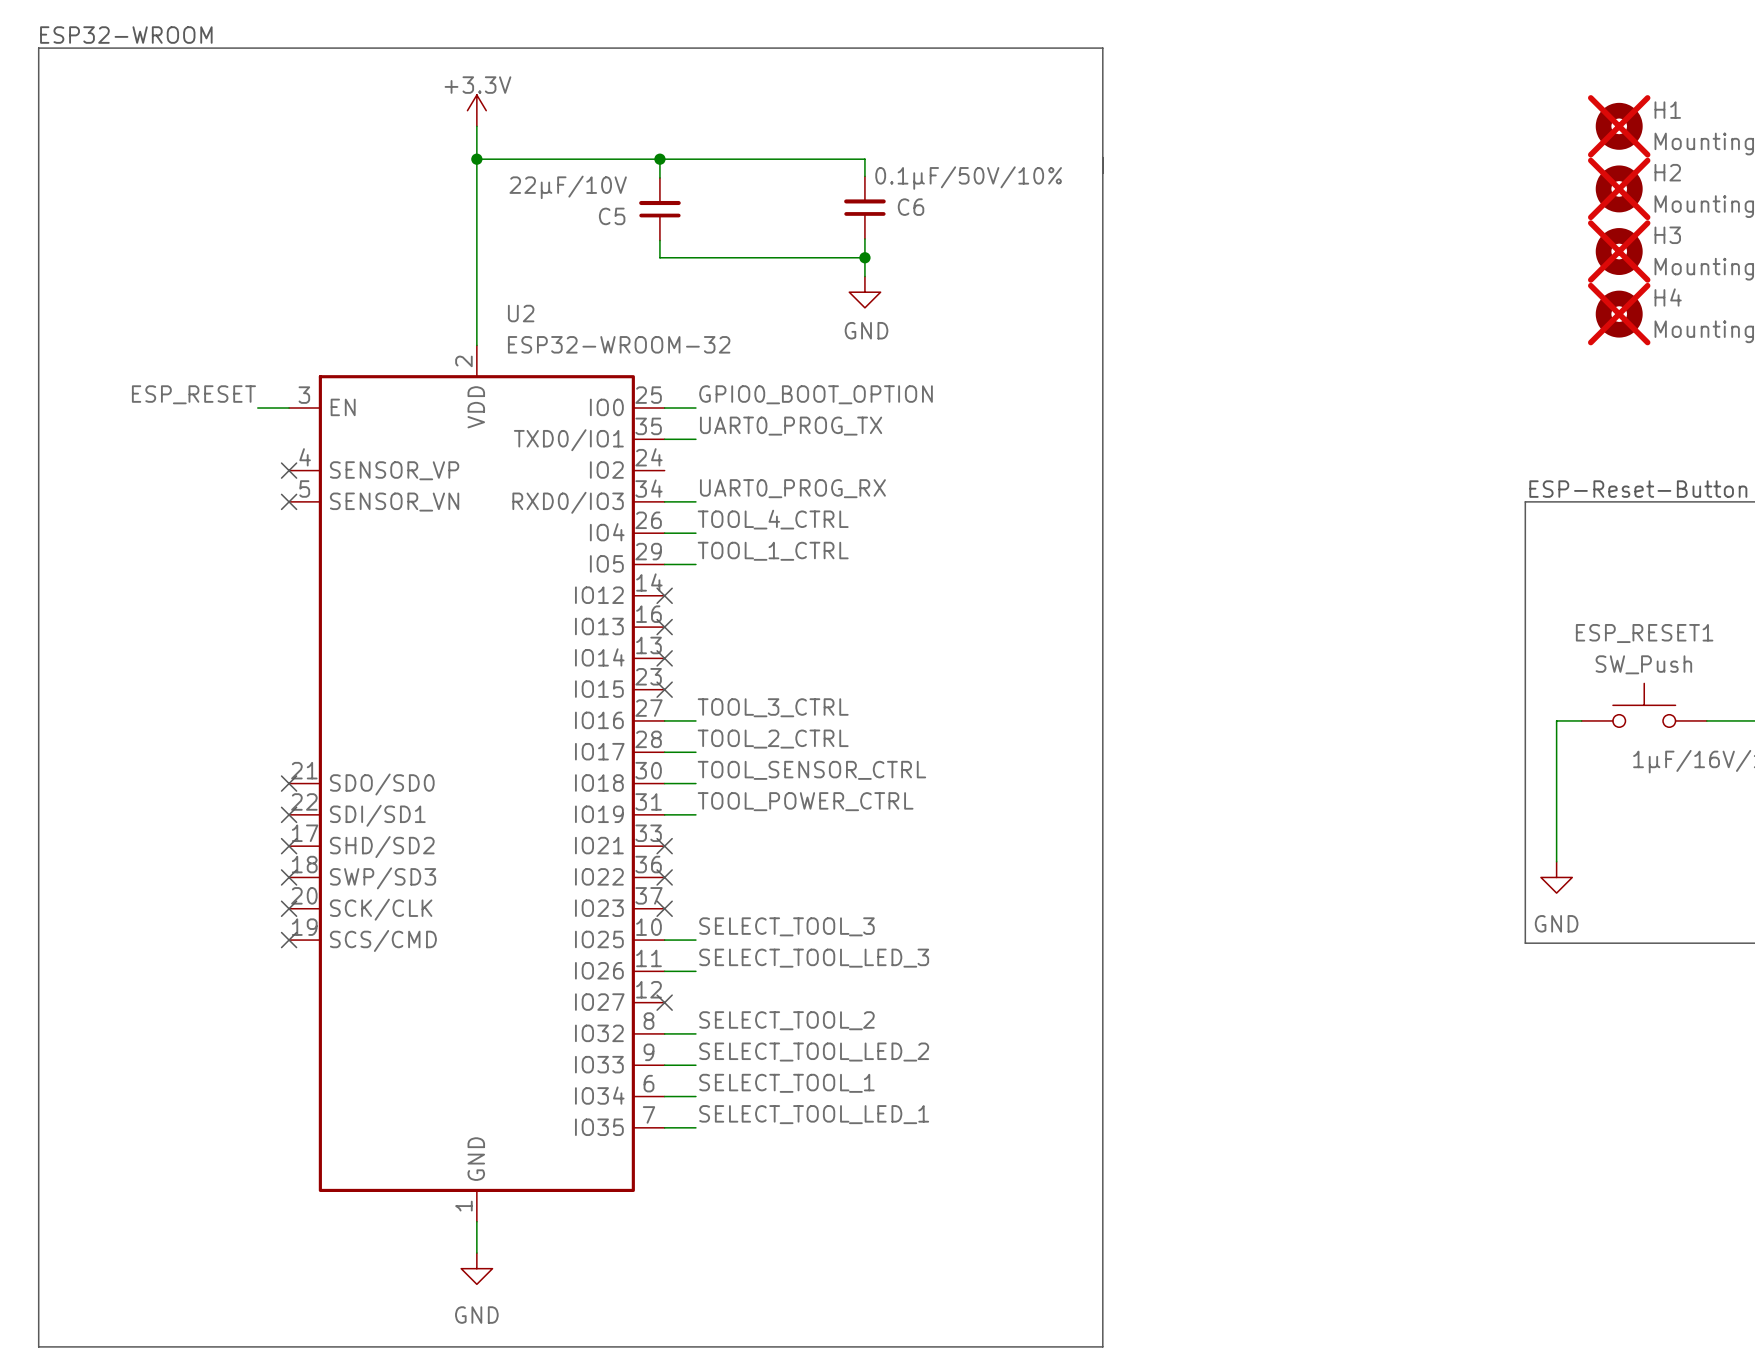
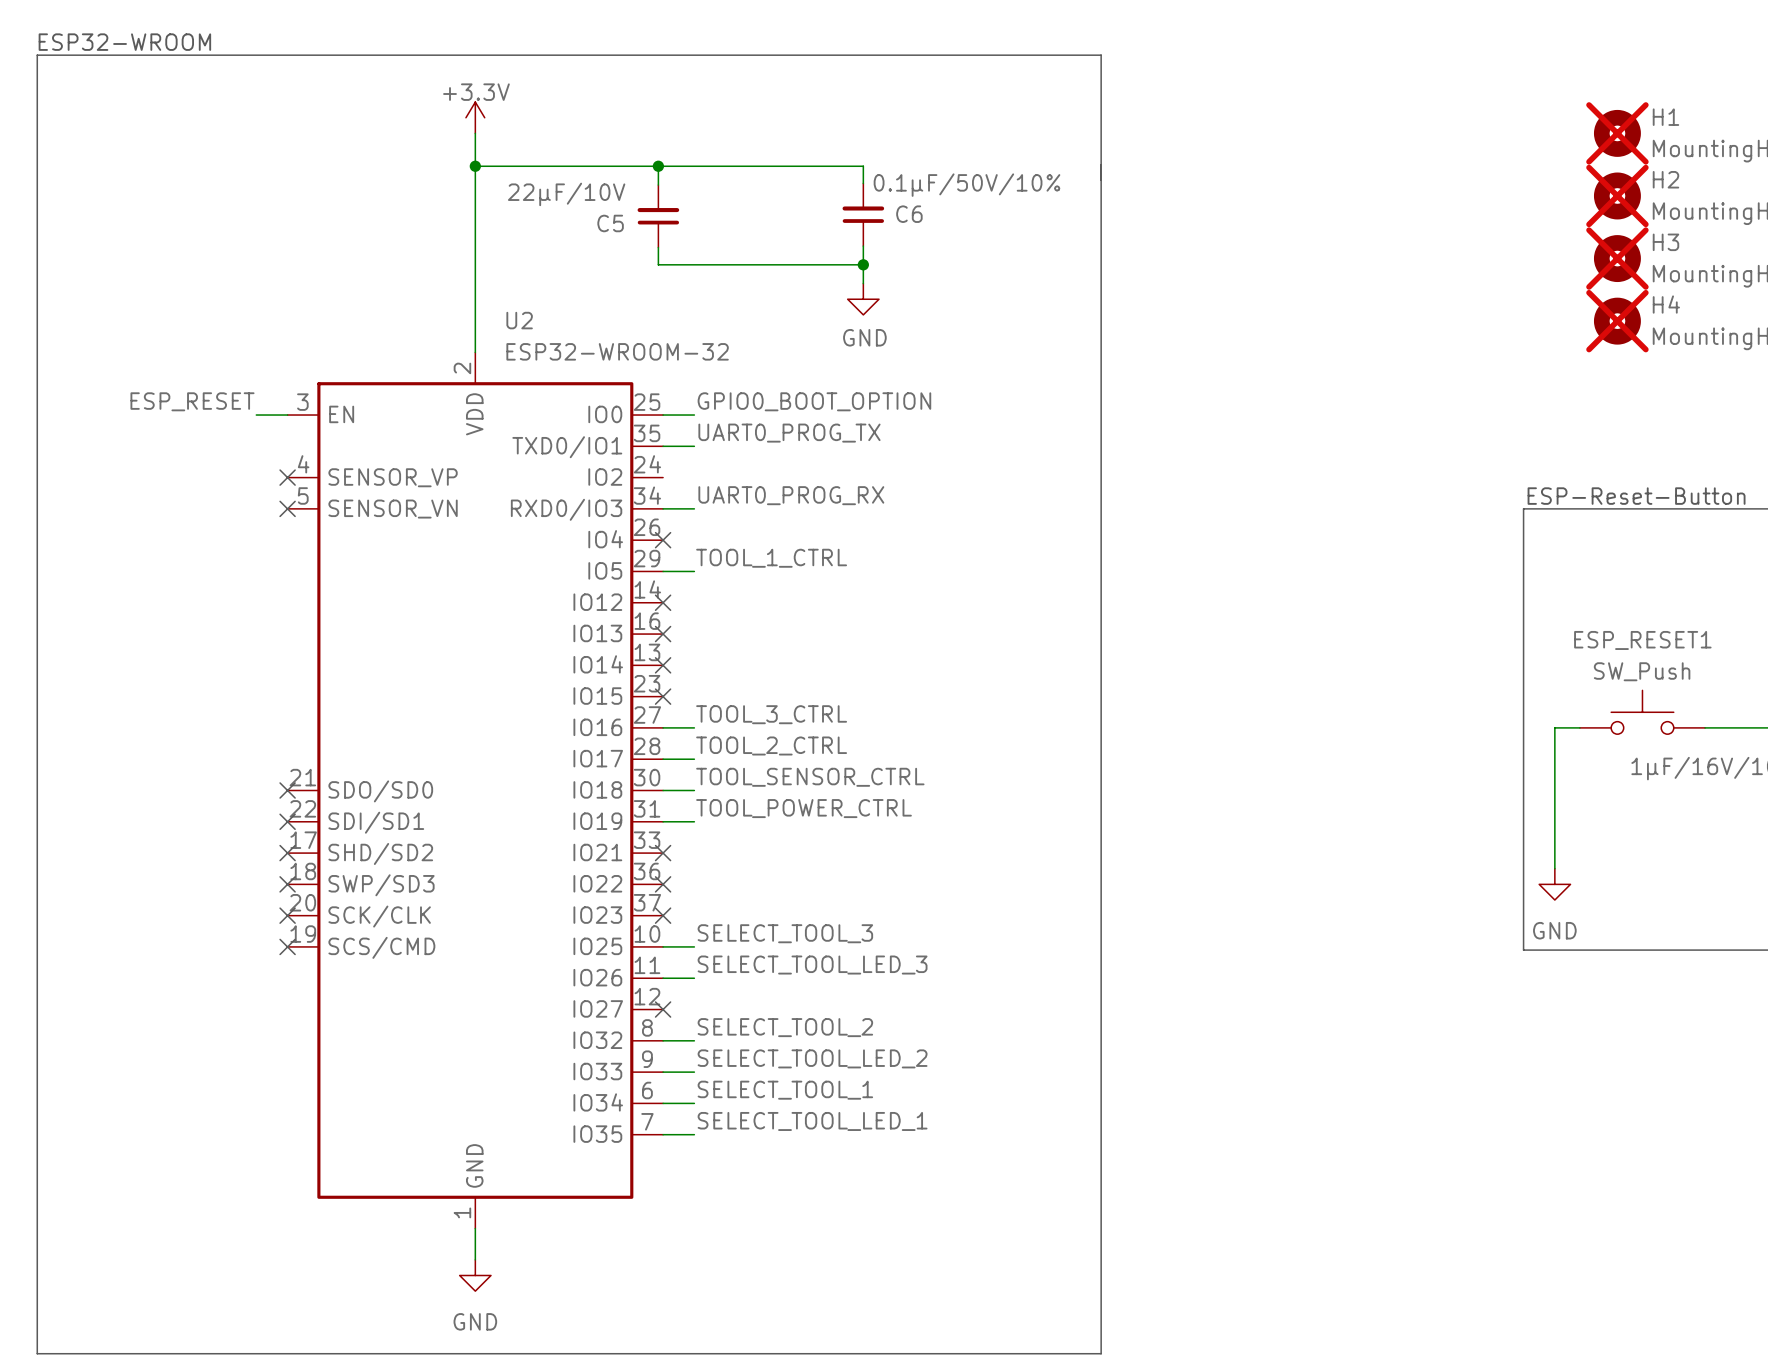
label: TOOL_4_CTRL (773, 519) -> none
wire: (664, 533) (695, 533) -> none
no-connect mark: none -> (663, 540)

